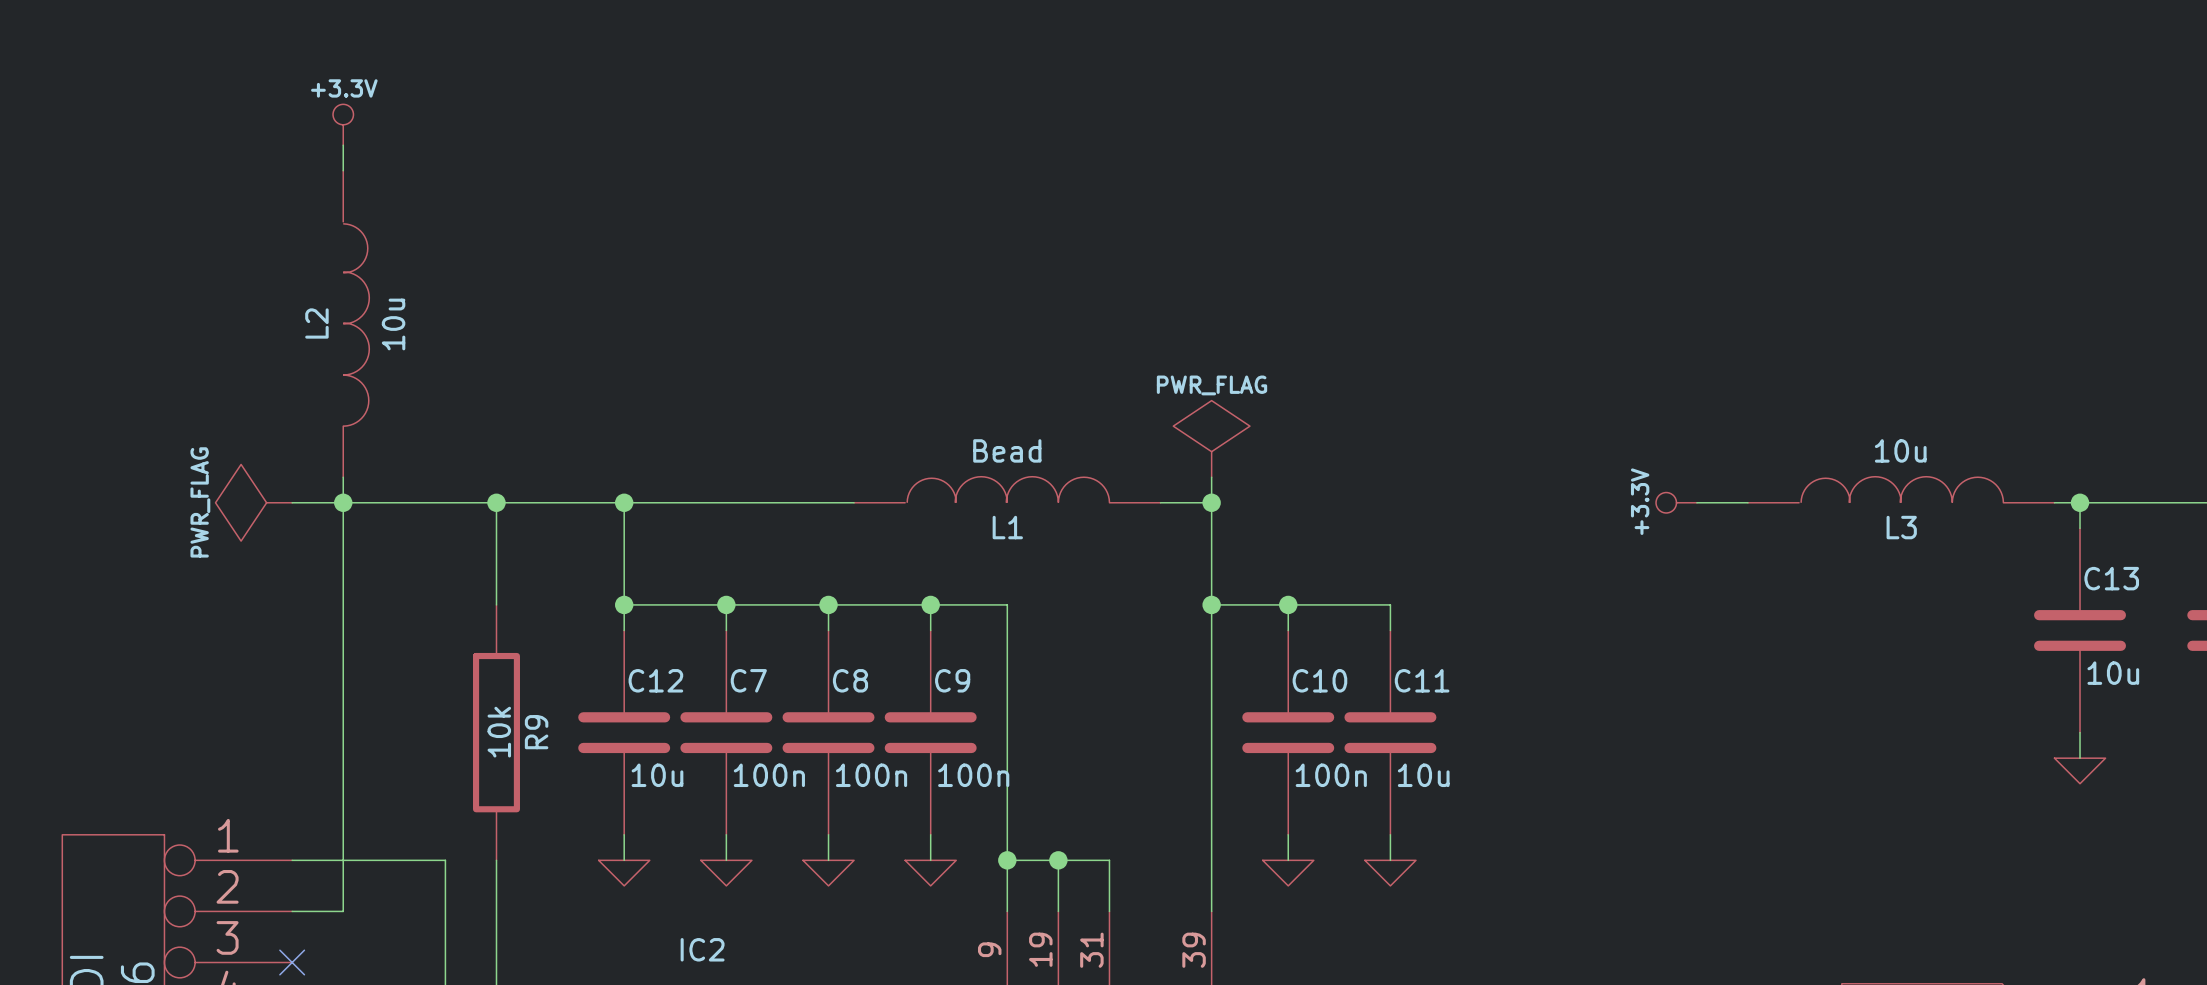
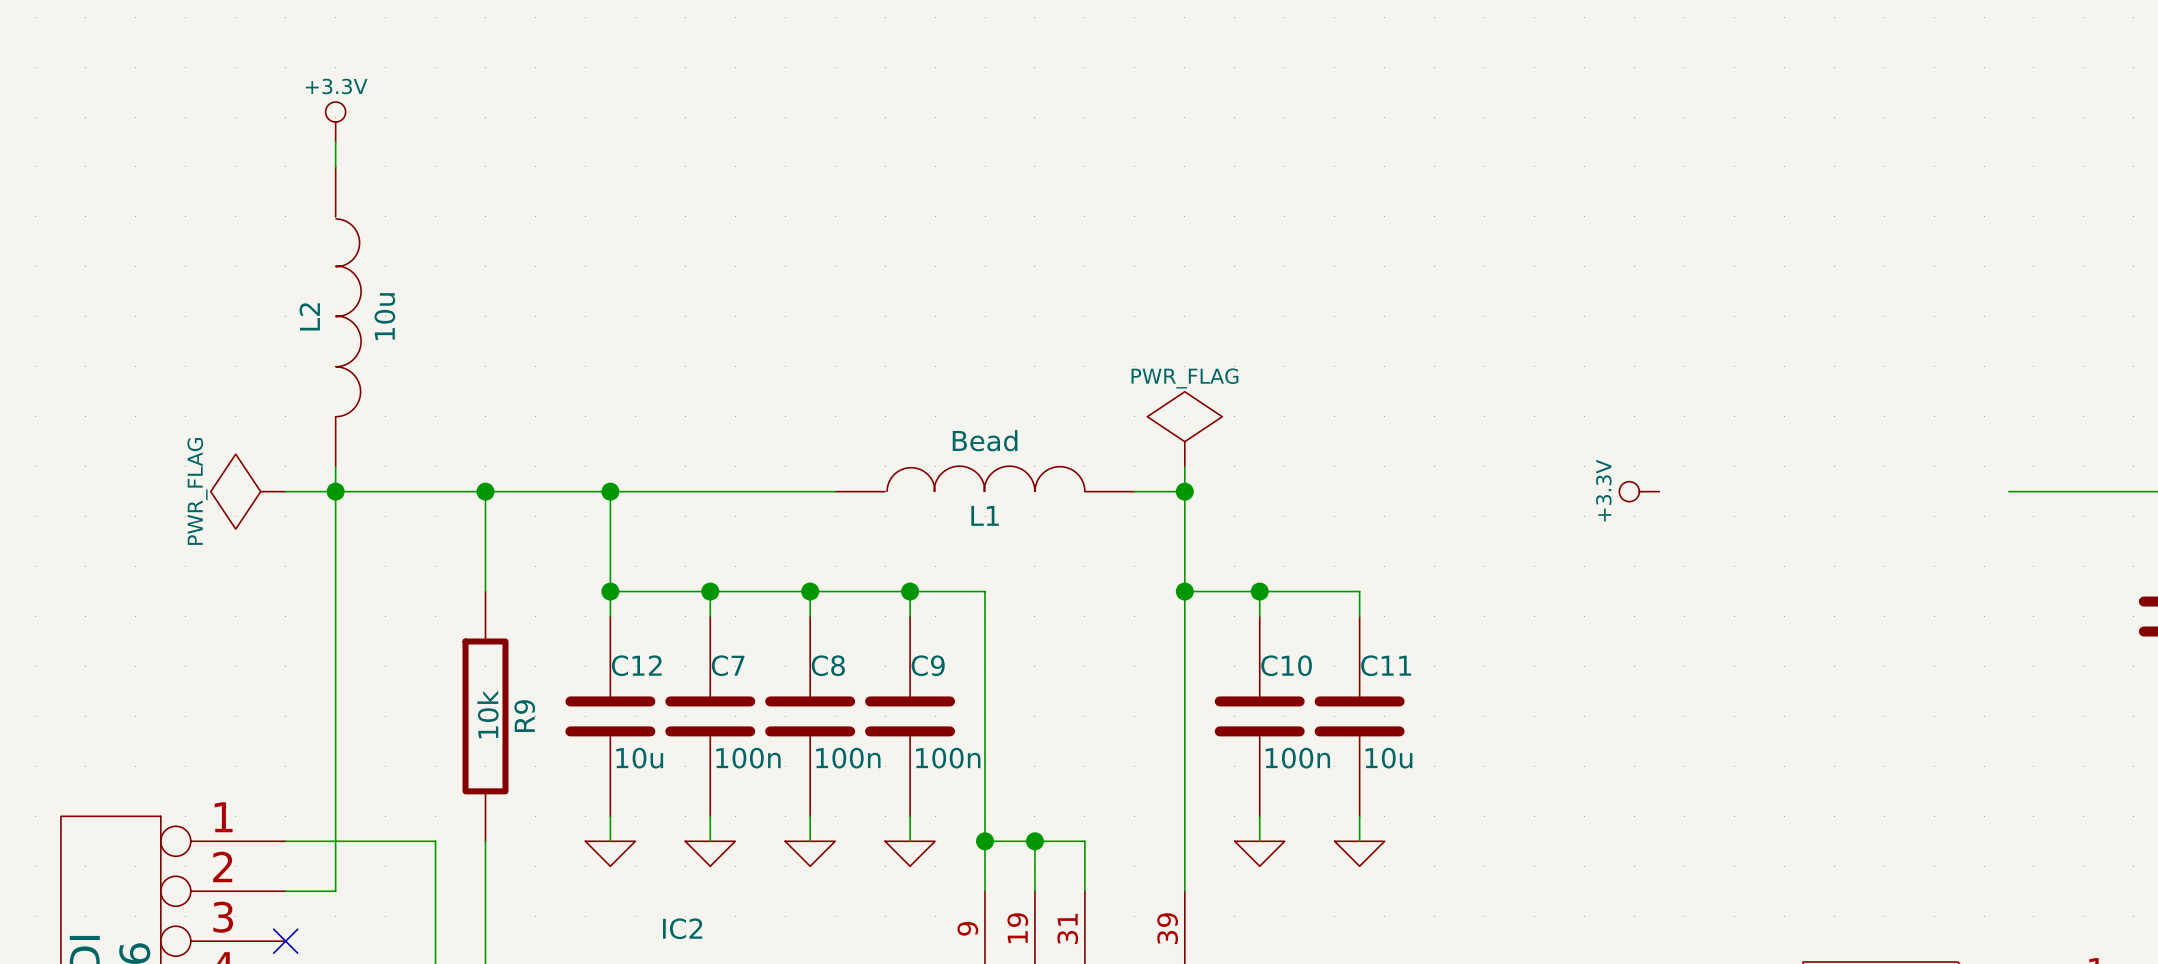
L3: 10u (1901, 489) -> none
wire: (1696, 502) (1747, 502) -> none
wire: (2080, 502) (2080, 528) -> none
junction: (2080, 502) -> none
C13: 10u (2080, 630) -> none
wire: (2080, 732) (2080, 758) -> none
power symbol: (2080, 770) -> none

